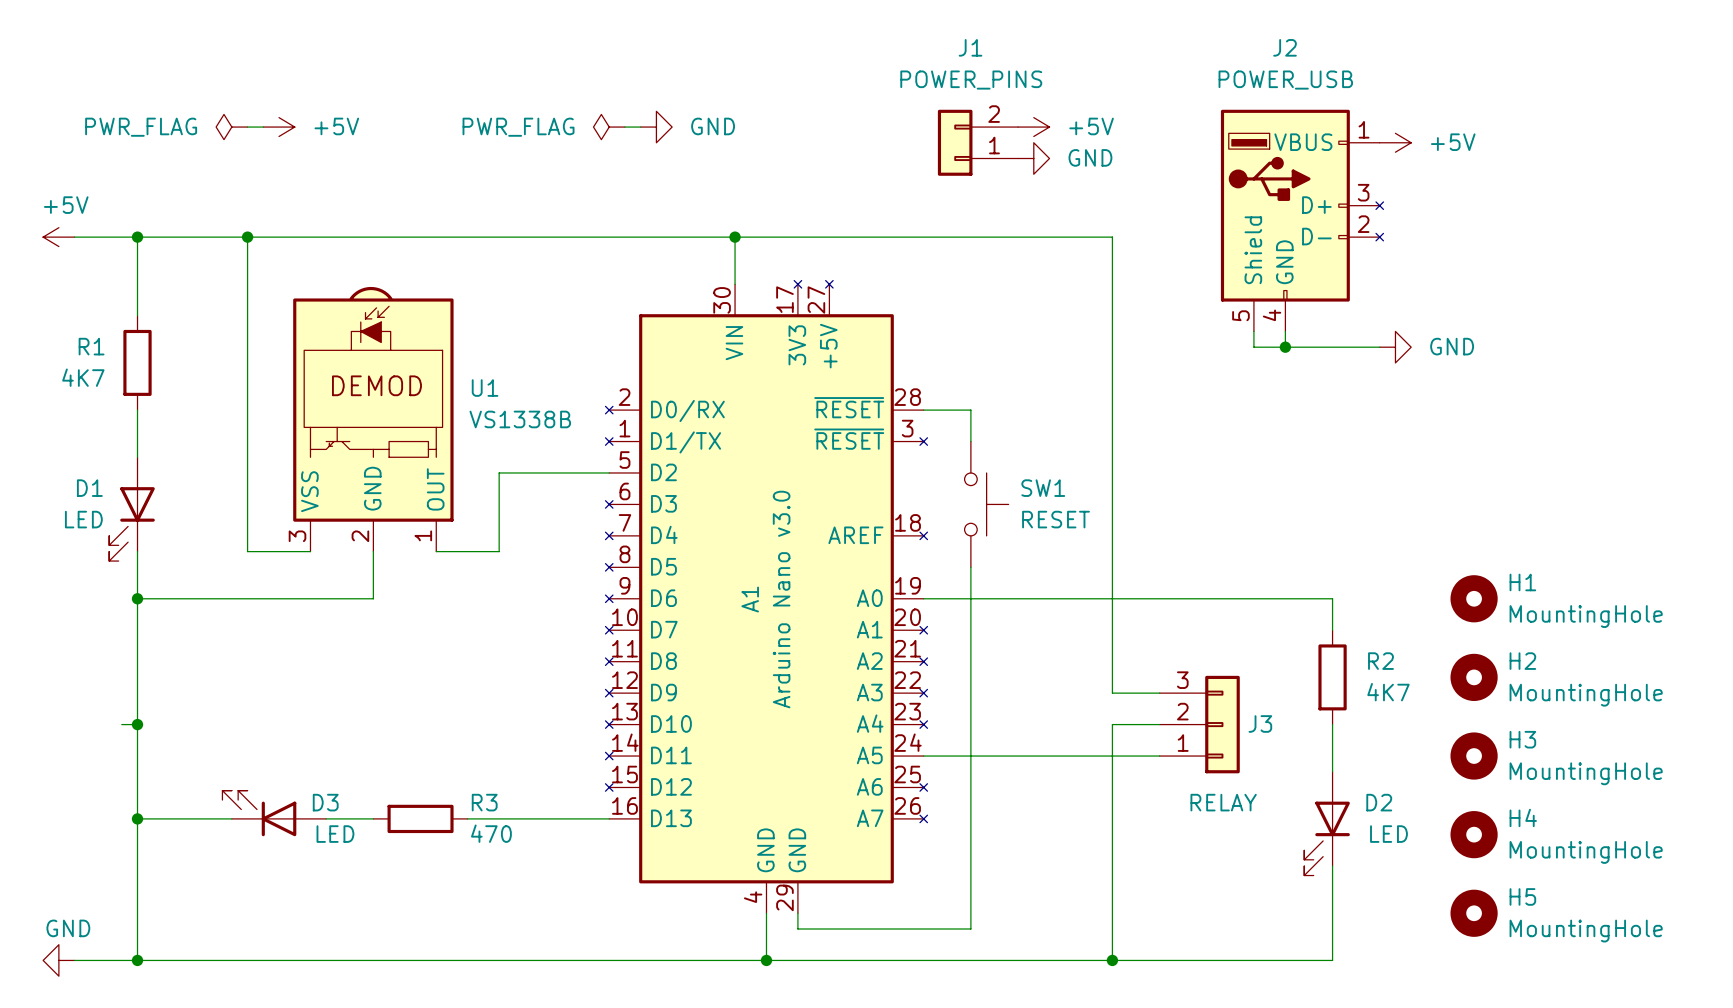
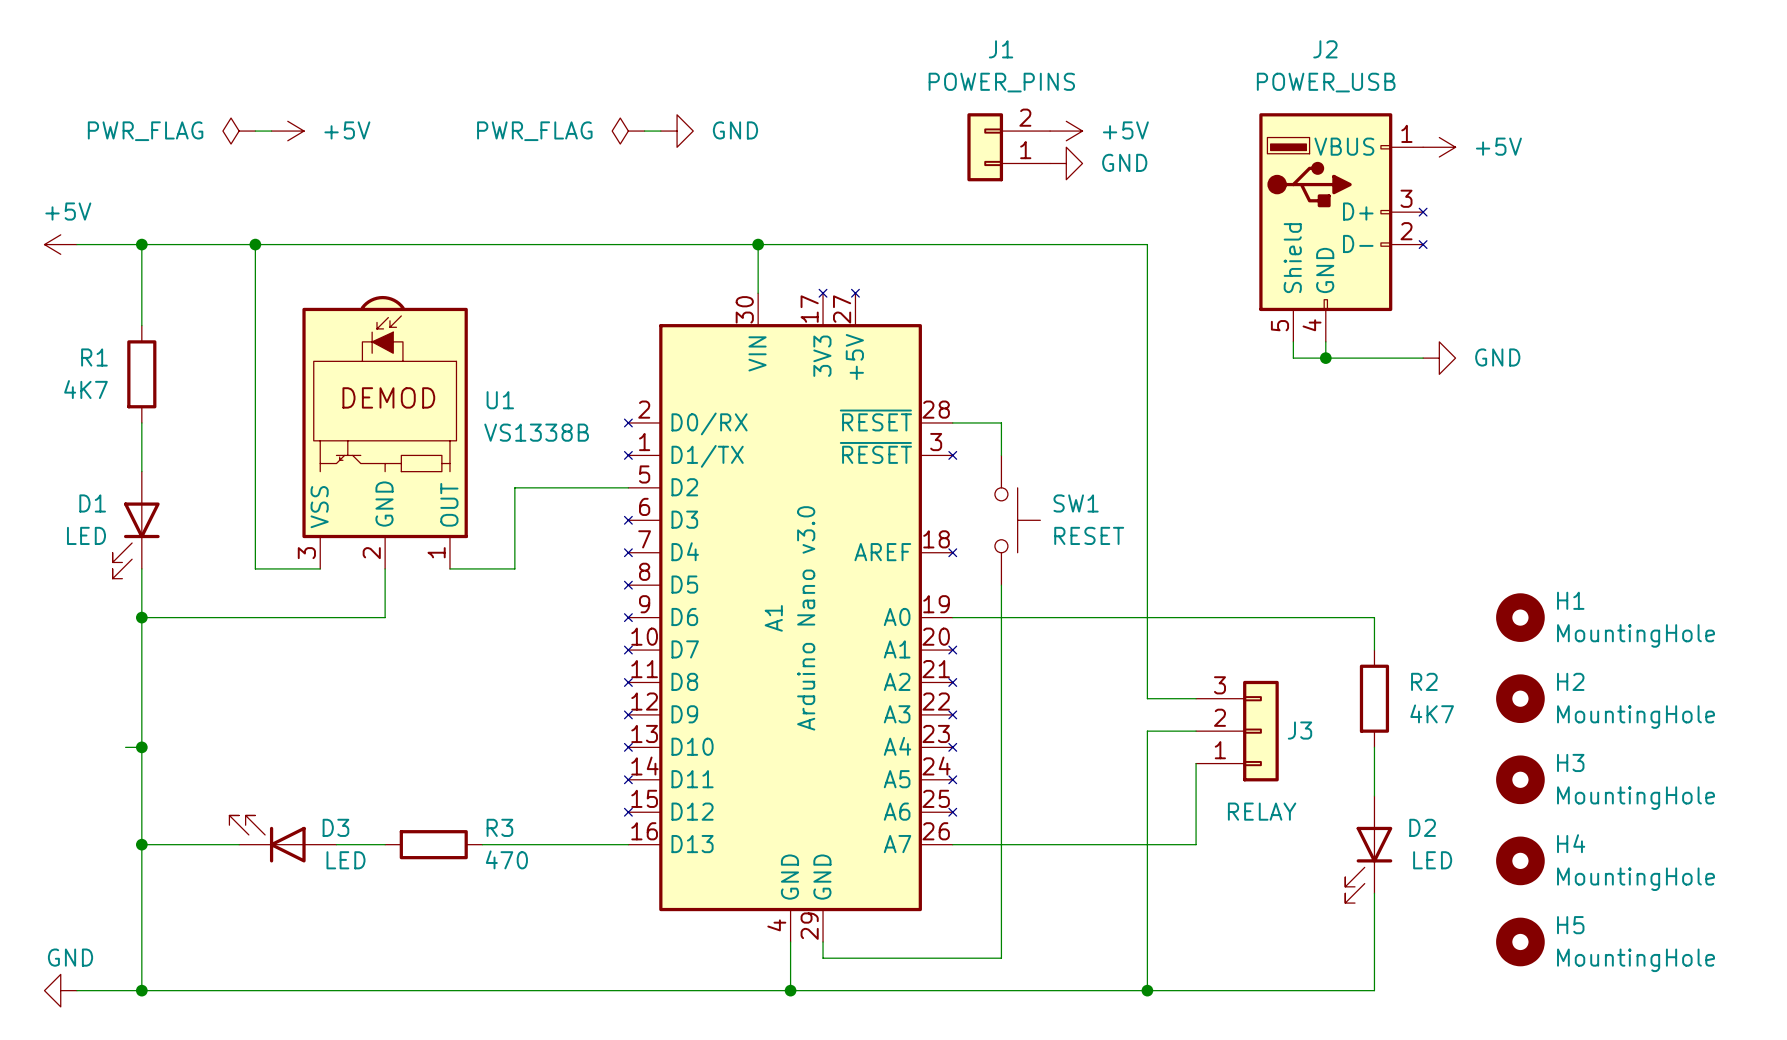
A1 symbol: [605, 280, 928, 914] -> [624, 289, 957, 942]
wire: (1112, 677) (1112, 693) (1159, 693) -> (1147, 698) (1196, 698)
wire: (1112, 724) (1159, 724) -> (1147, 747) (1147, 731) (1196, 731)
J3 position: (1199, 724) -> (1237, 731)
wire: none -> (1196, 763) (1196, 844) (952, 844)
wire: (923, 756) (1159, 756) -> none

